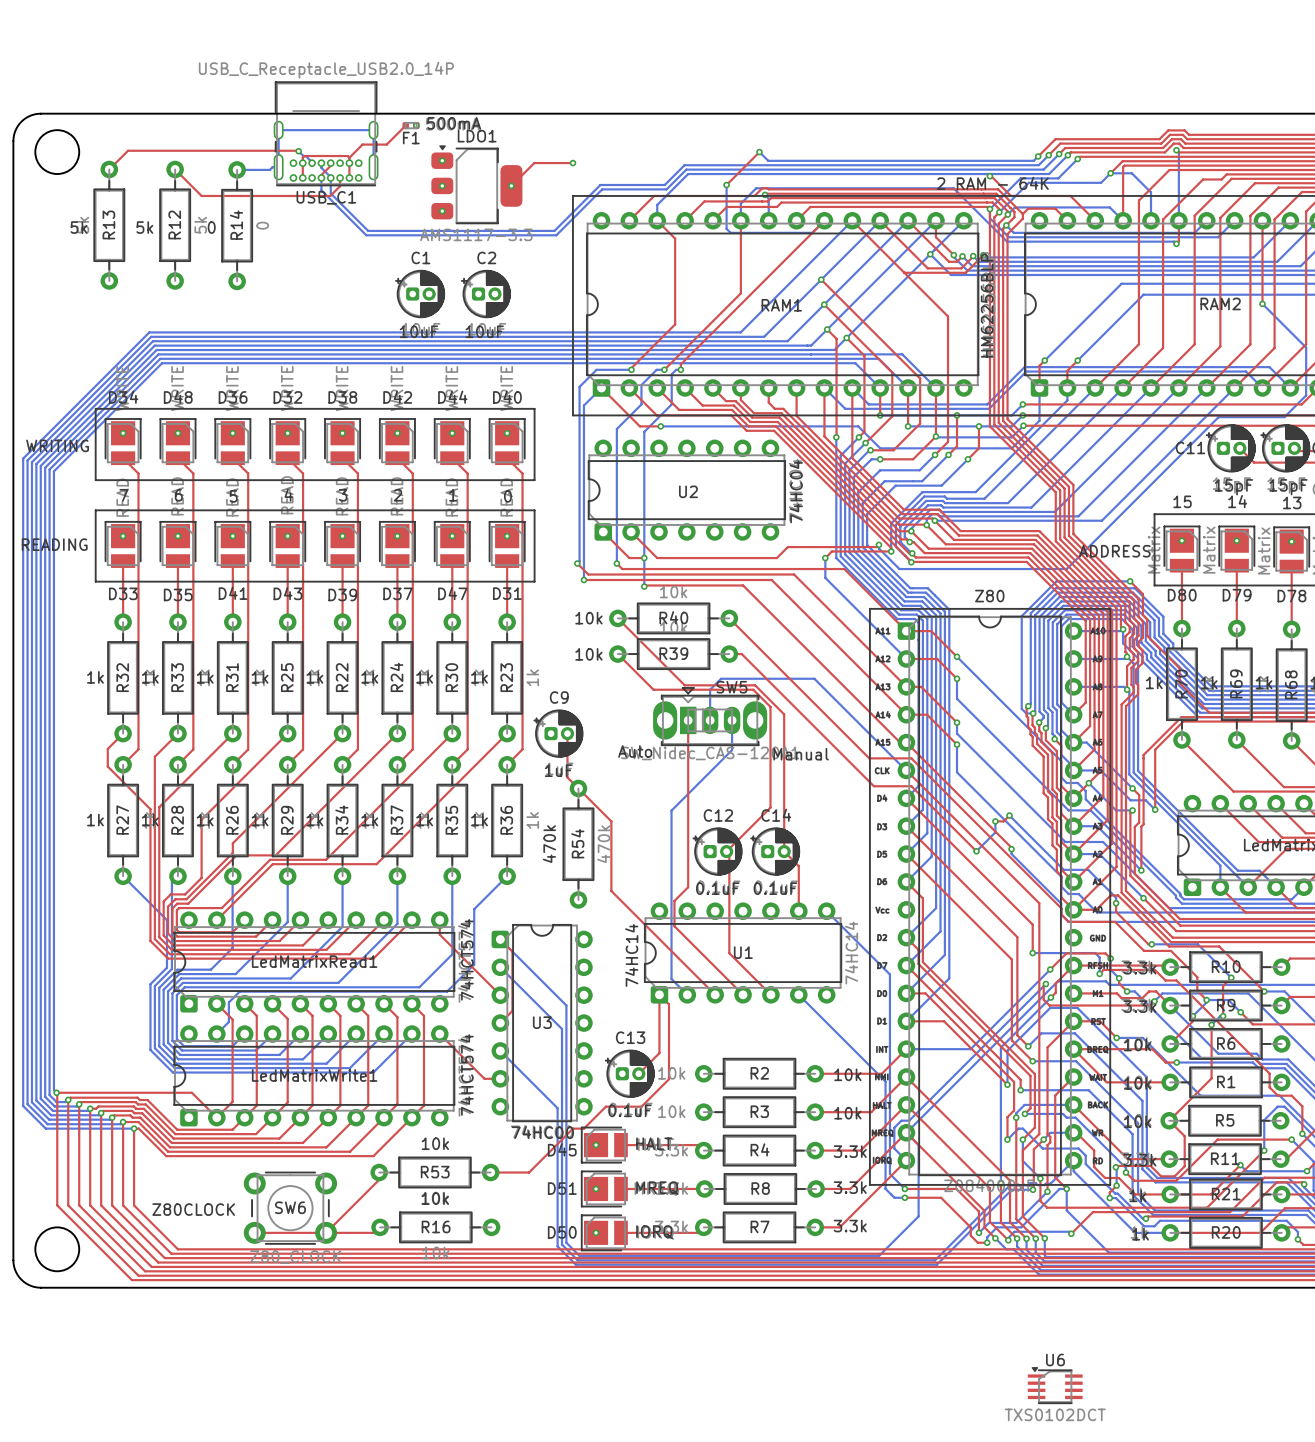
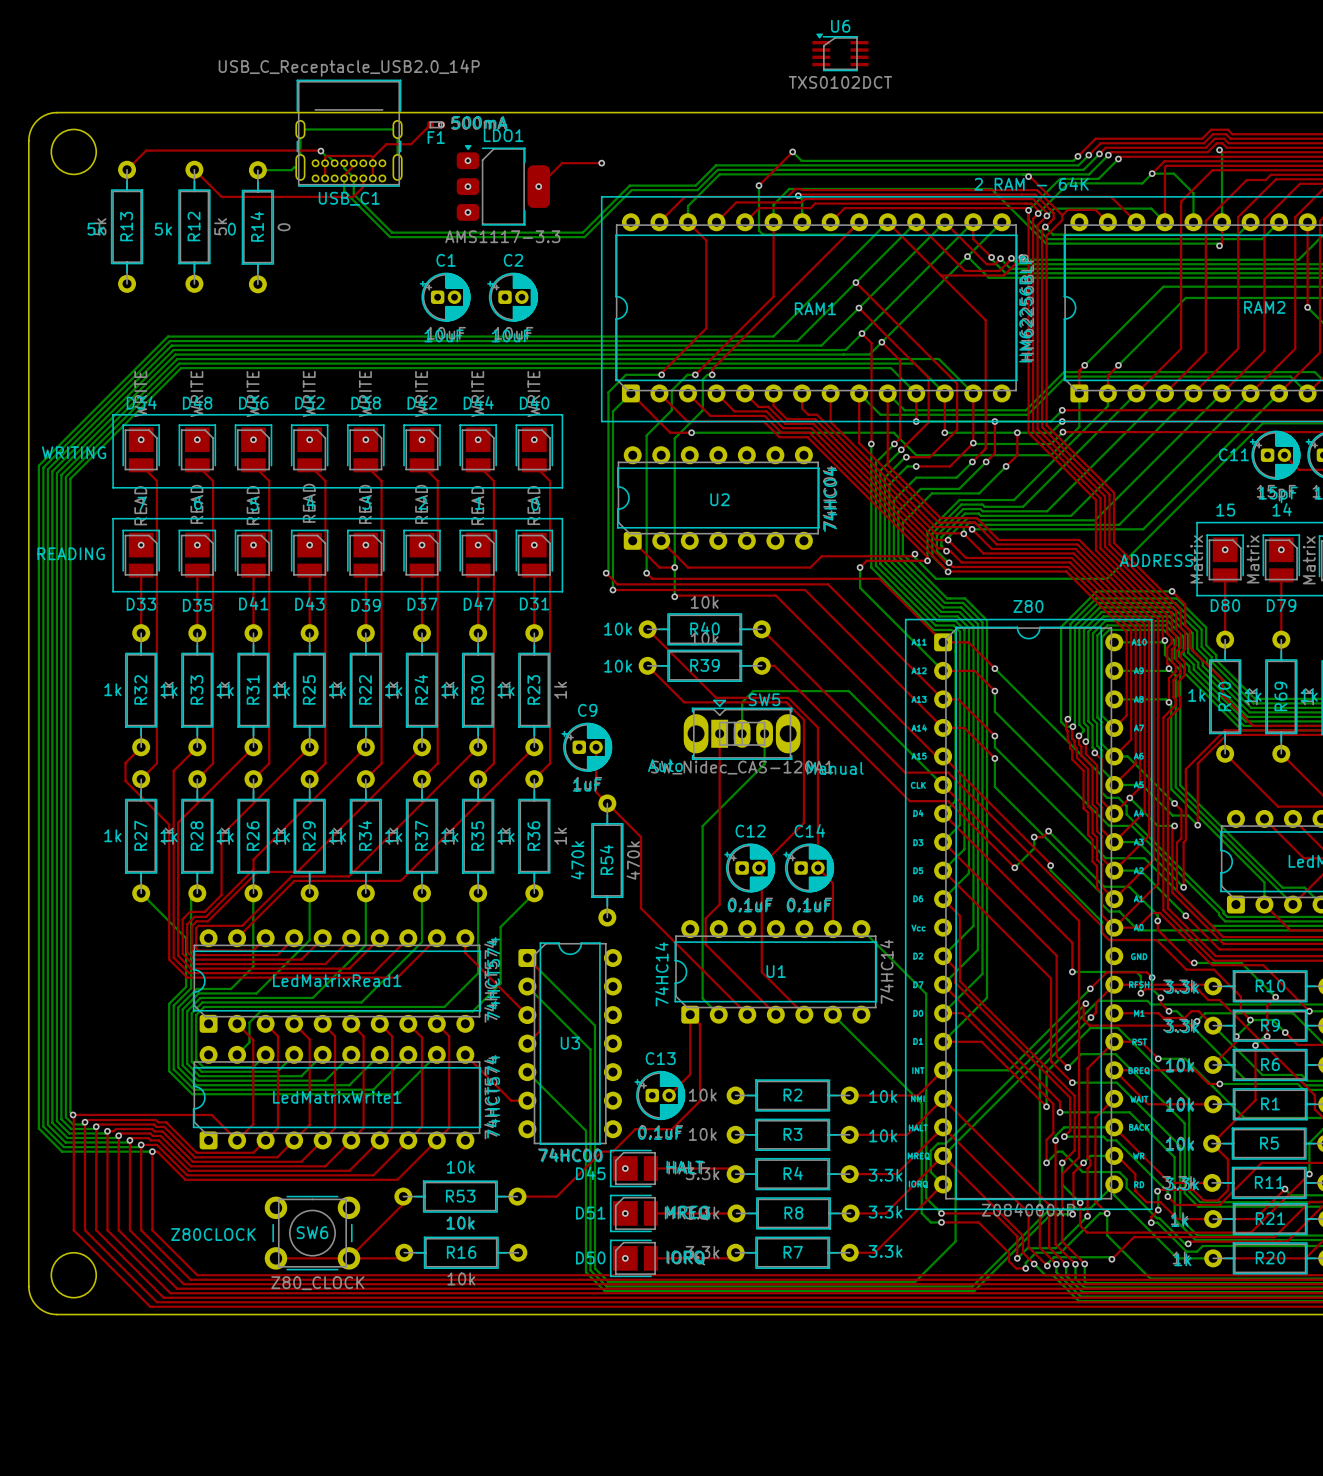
U6 position: (1055, 1385) -> (840, 52)

